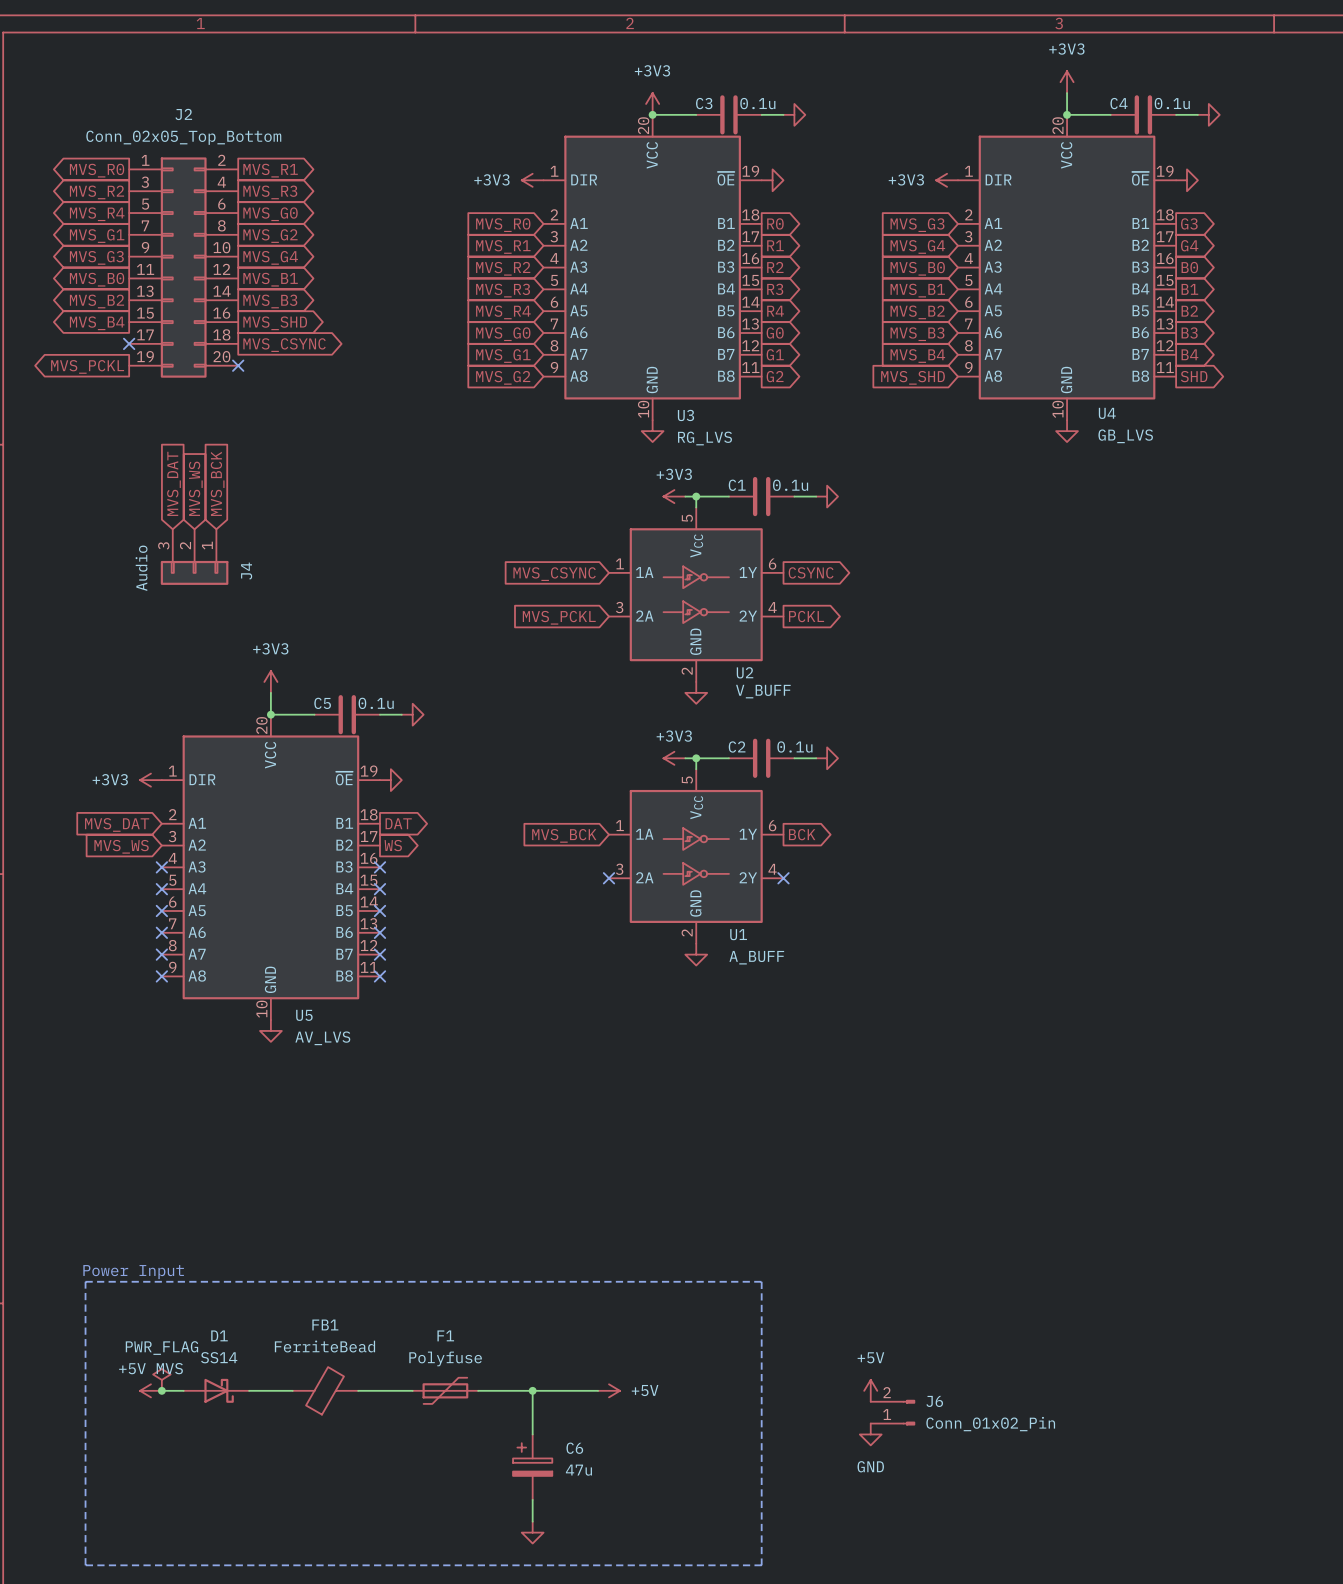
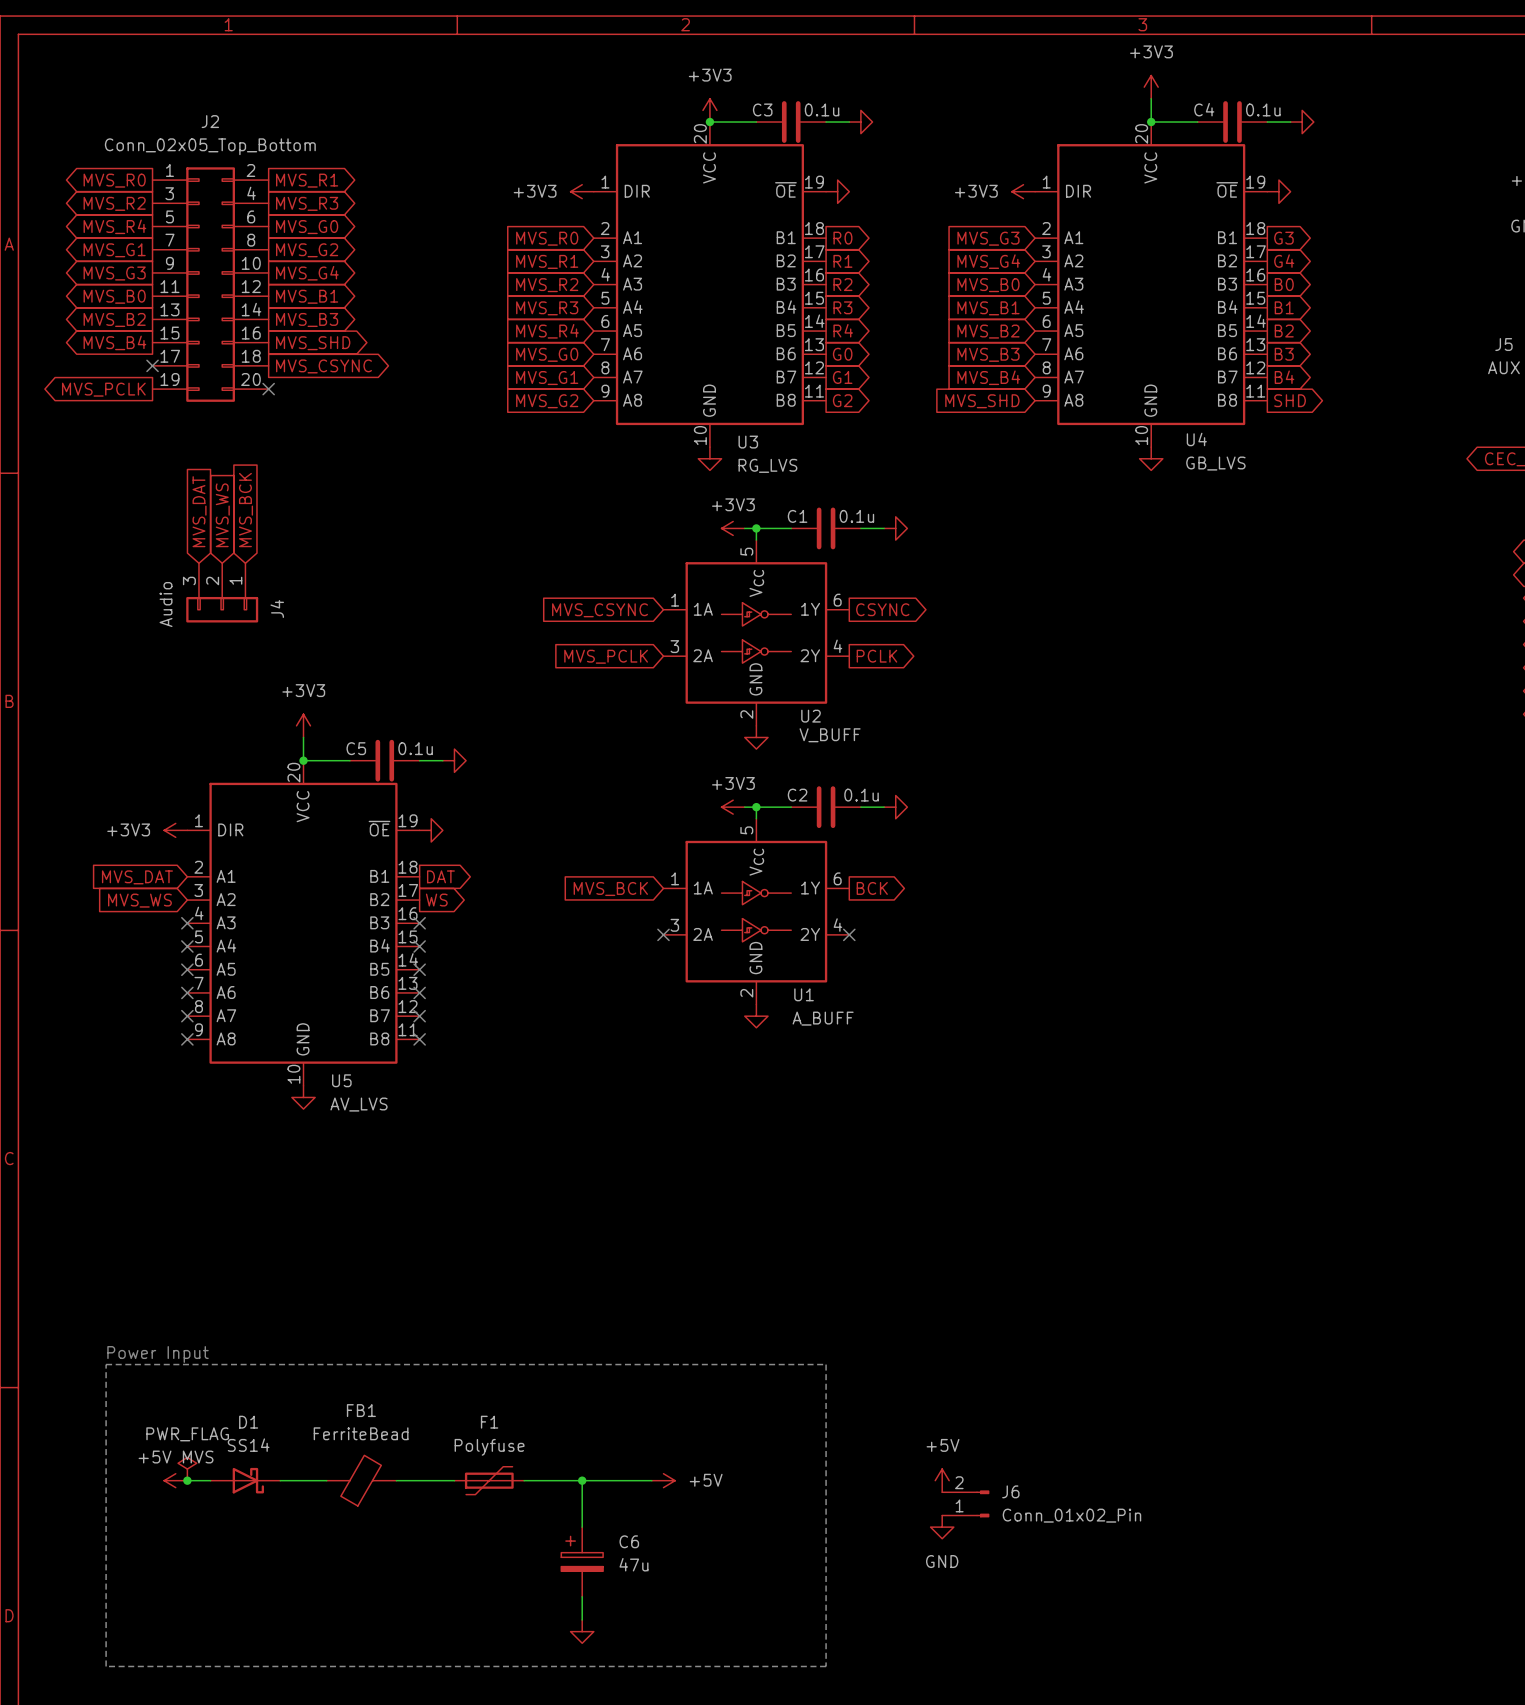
global label: MVS_PCKL (87, 366) -> MVS_PCLK (103, 389)
global label: PCKL (806, 616) -> PCLK (876, 656)
global label: MVS_PCKL (559, 617) -> MVS_PCLK (606, 656)

